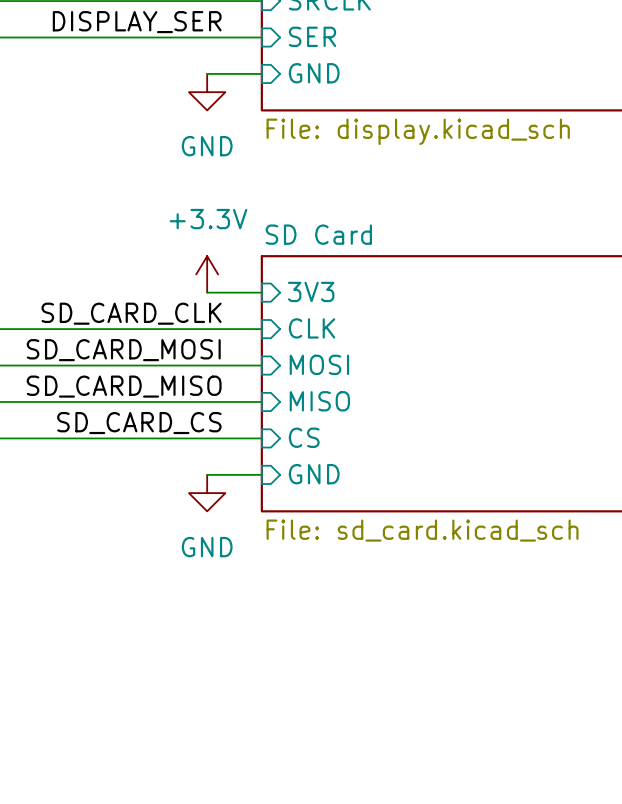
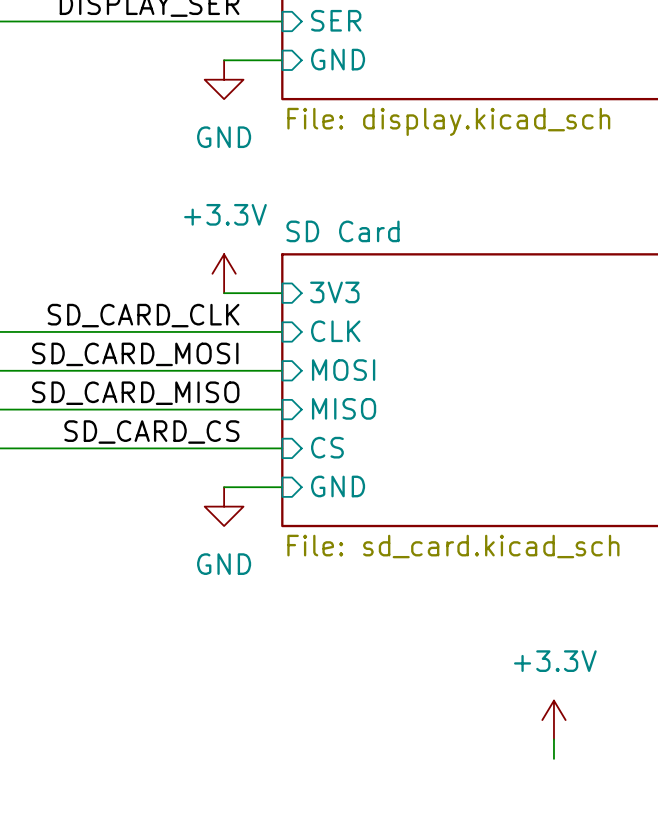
power symbol: none -> +3.3V (553, 720)
wire: none -> (553, 739) (553, 758)

